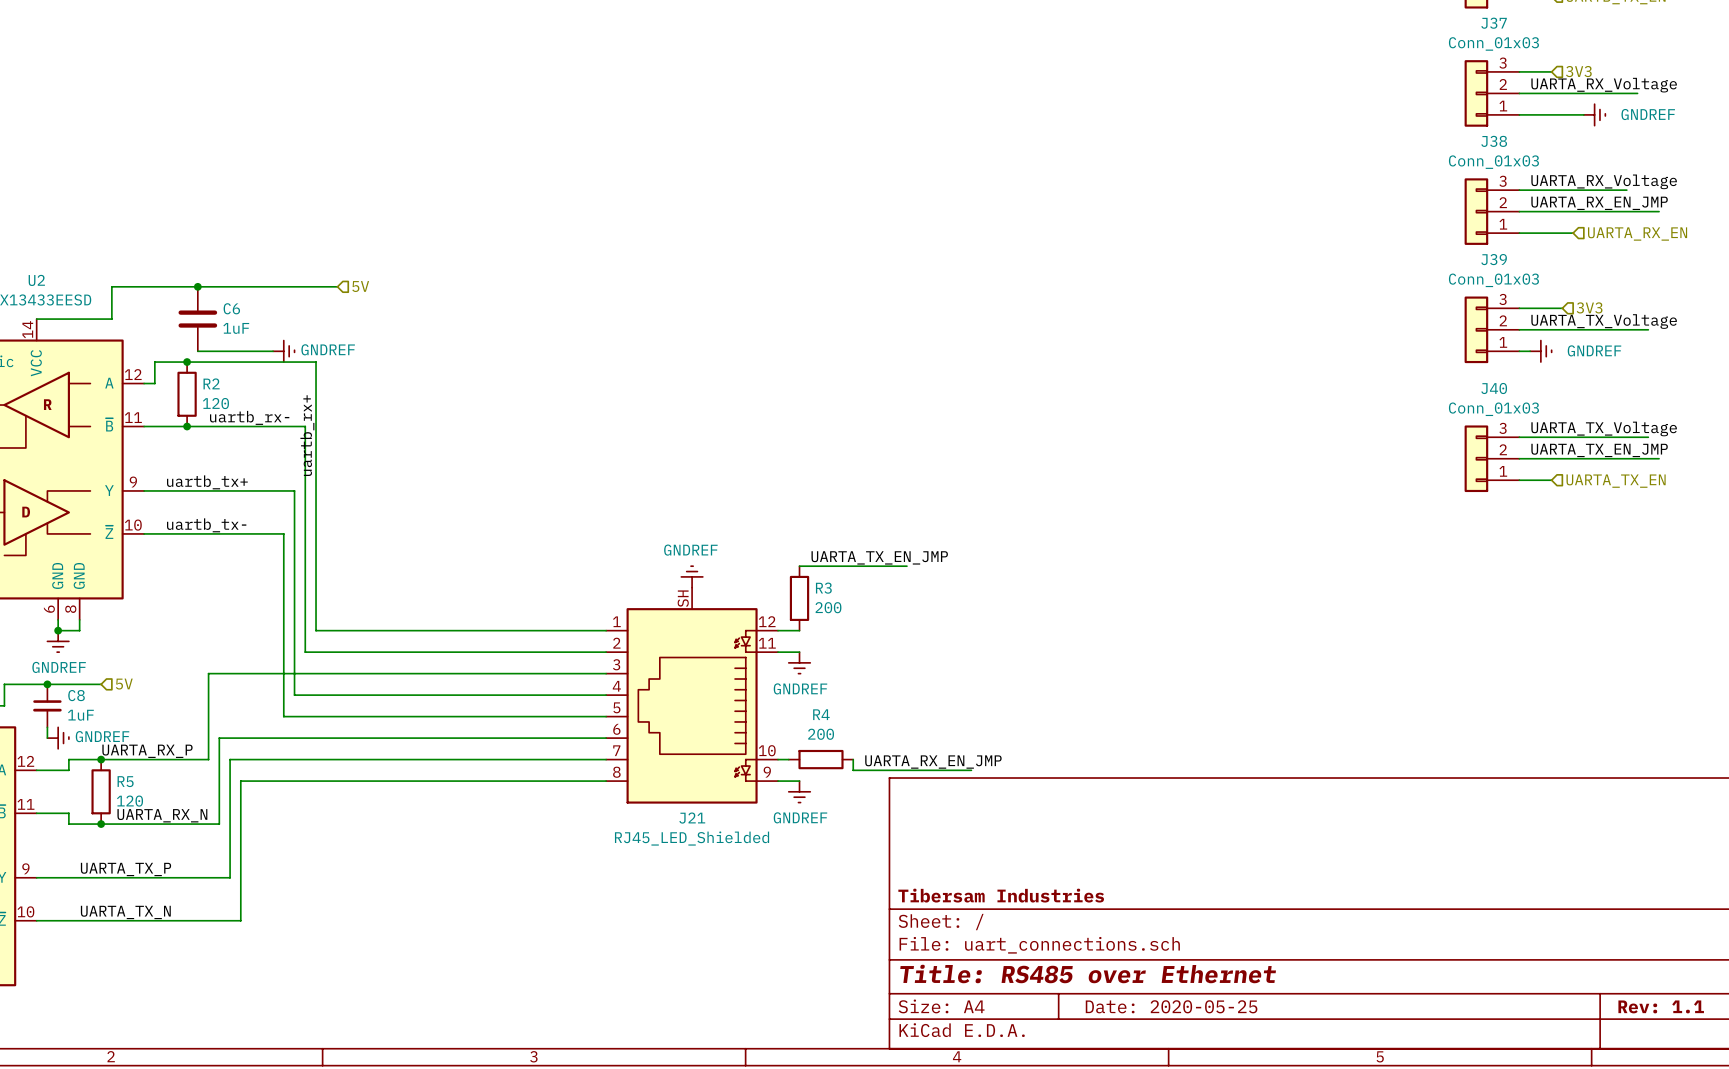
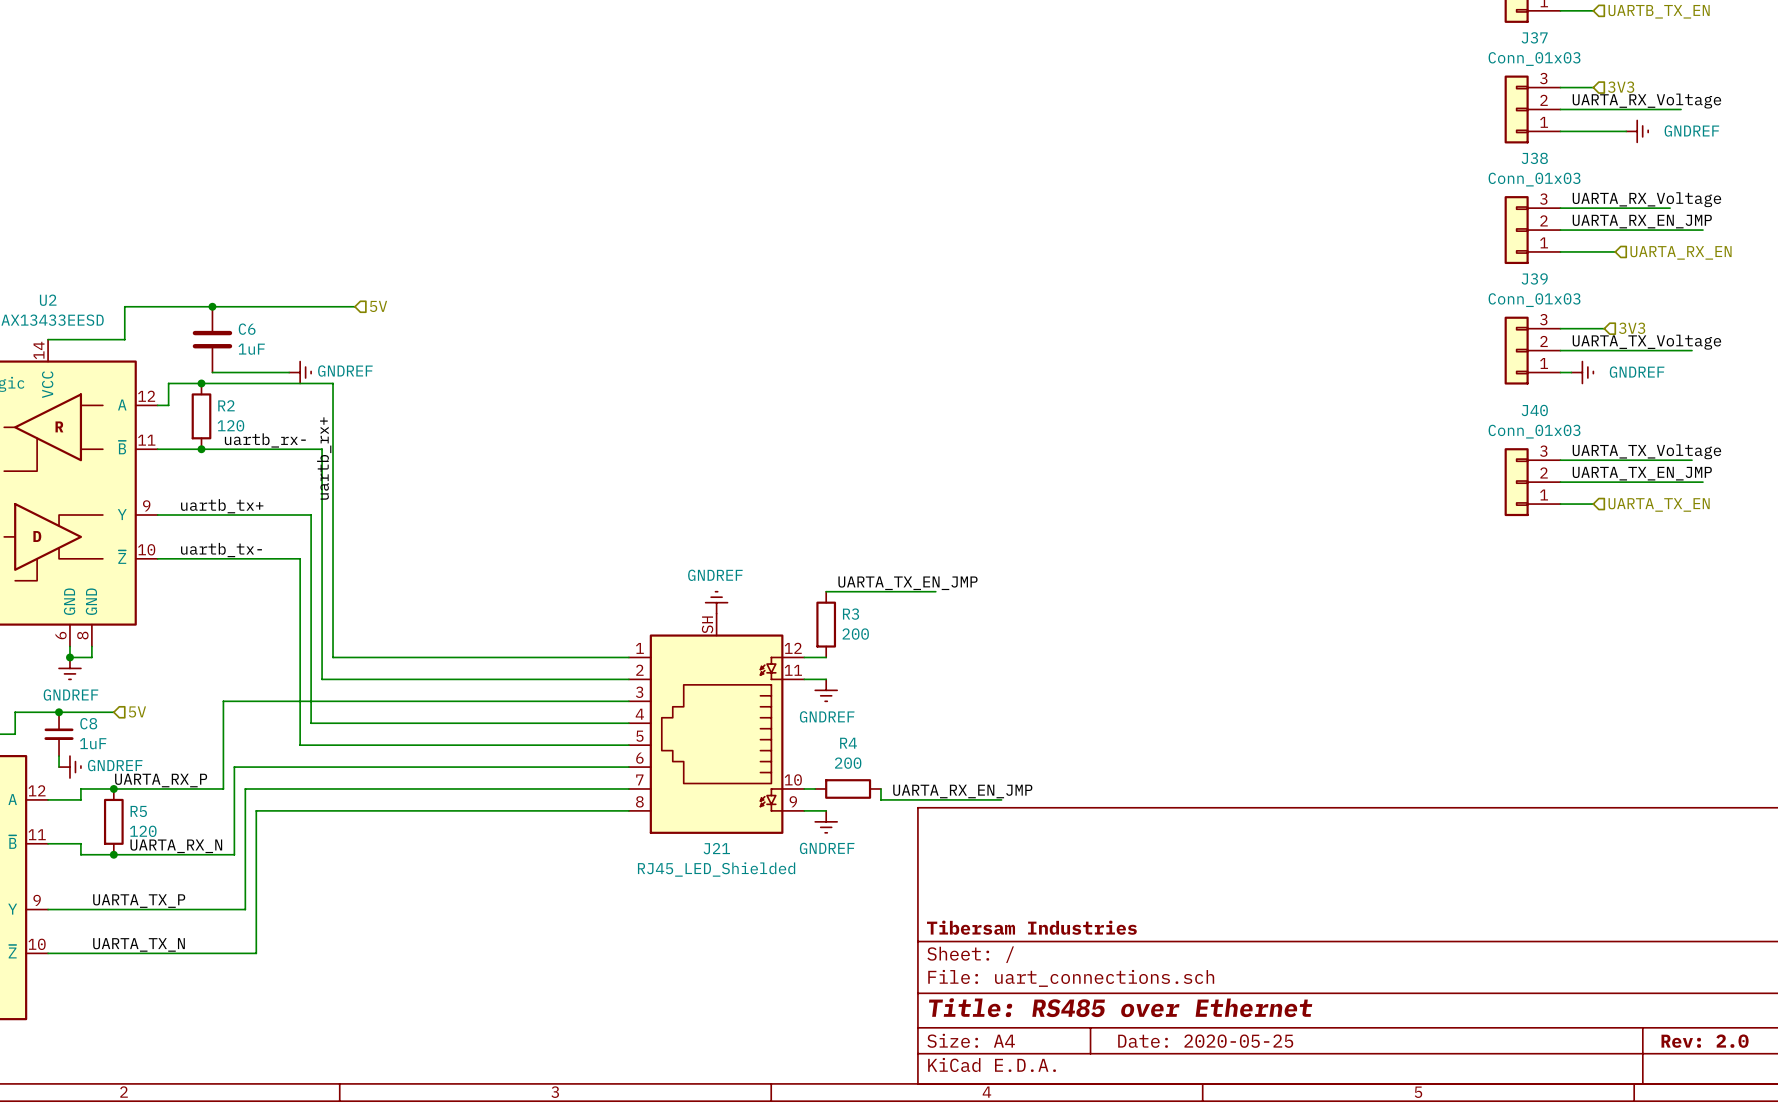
title block: Rev: 1.1 (1661, 1006) -> Rev: 2.0 (1705, 1041)

